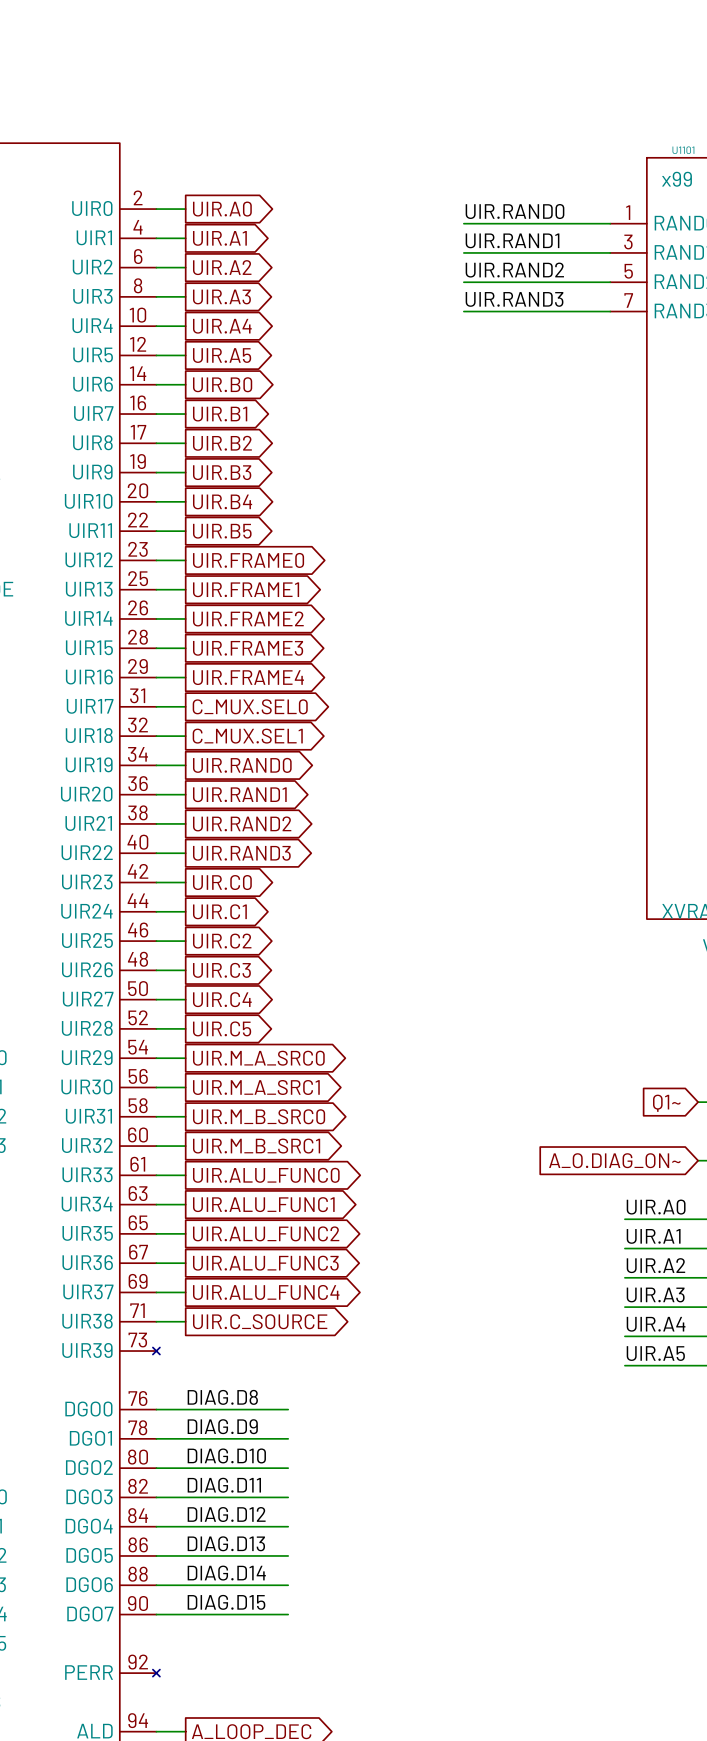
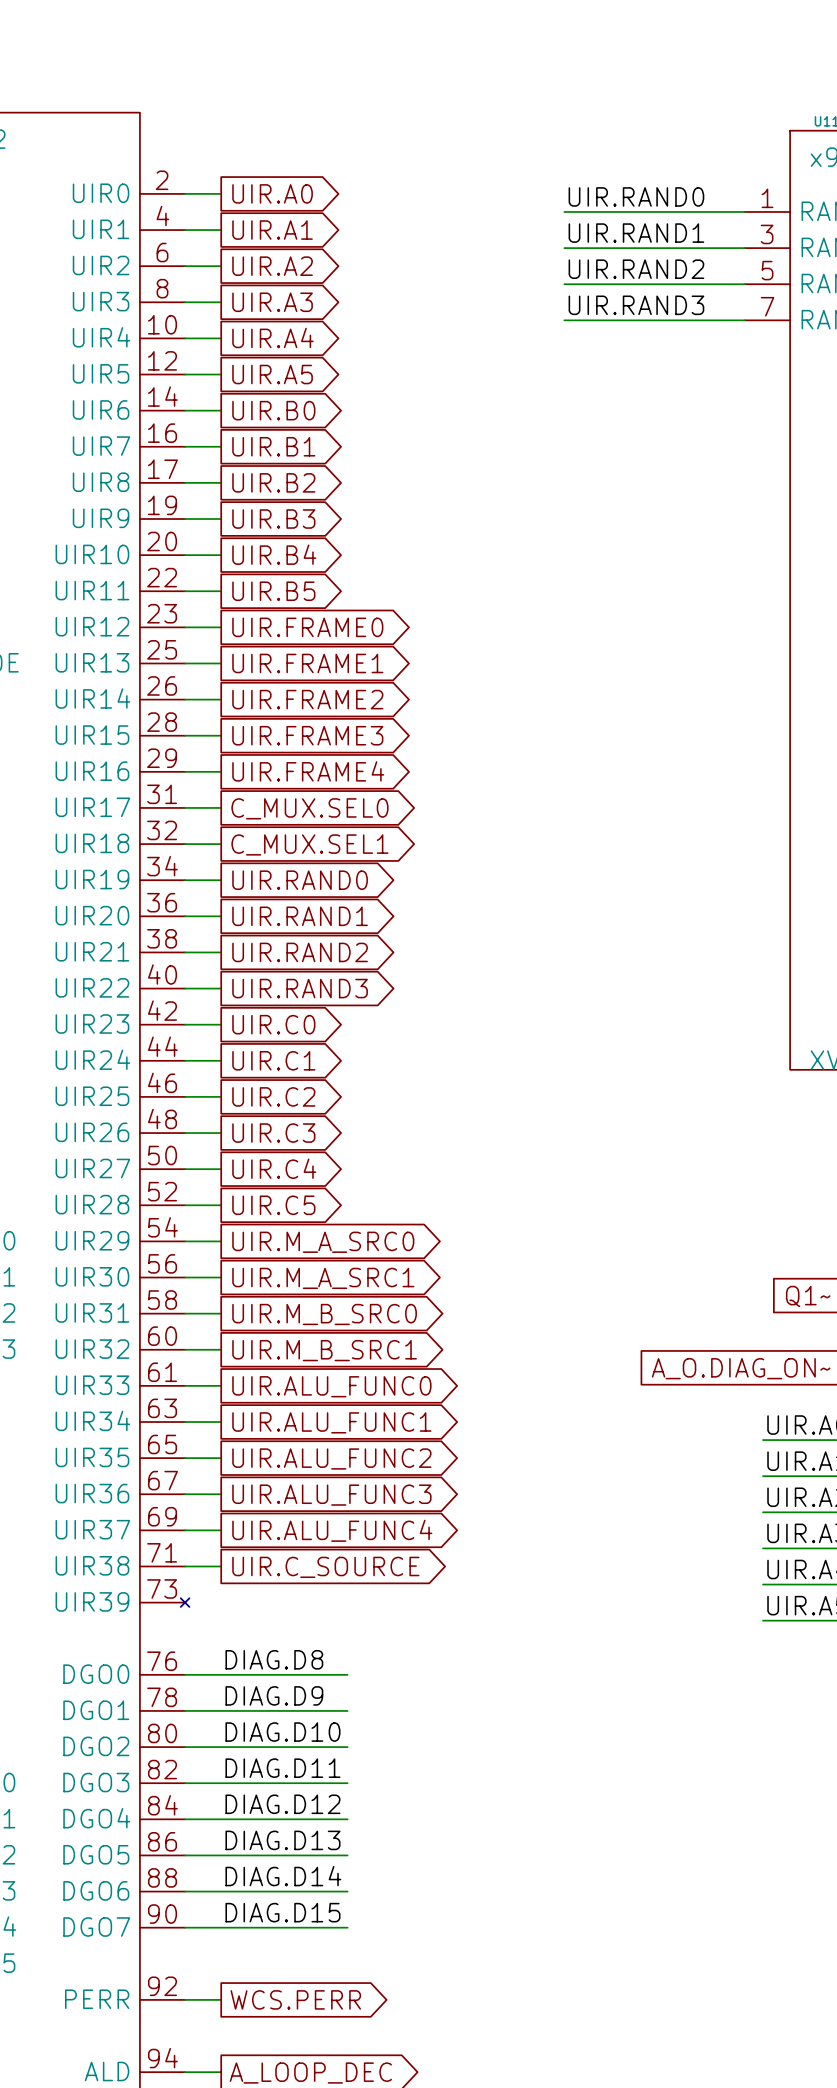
wire: none -> (185, 1999) (221, 1999)
no-connect mark: (156, 1673) -> none
global label: none -> WCS.PERR (295, 1999)

